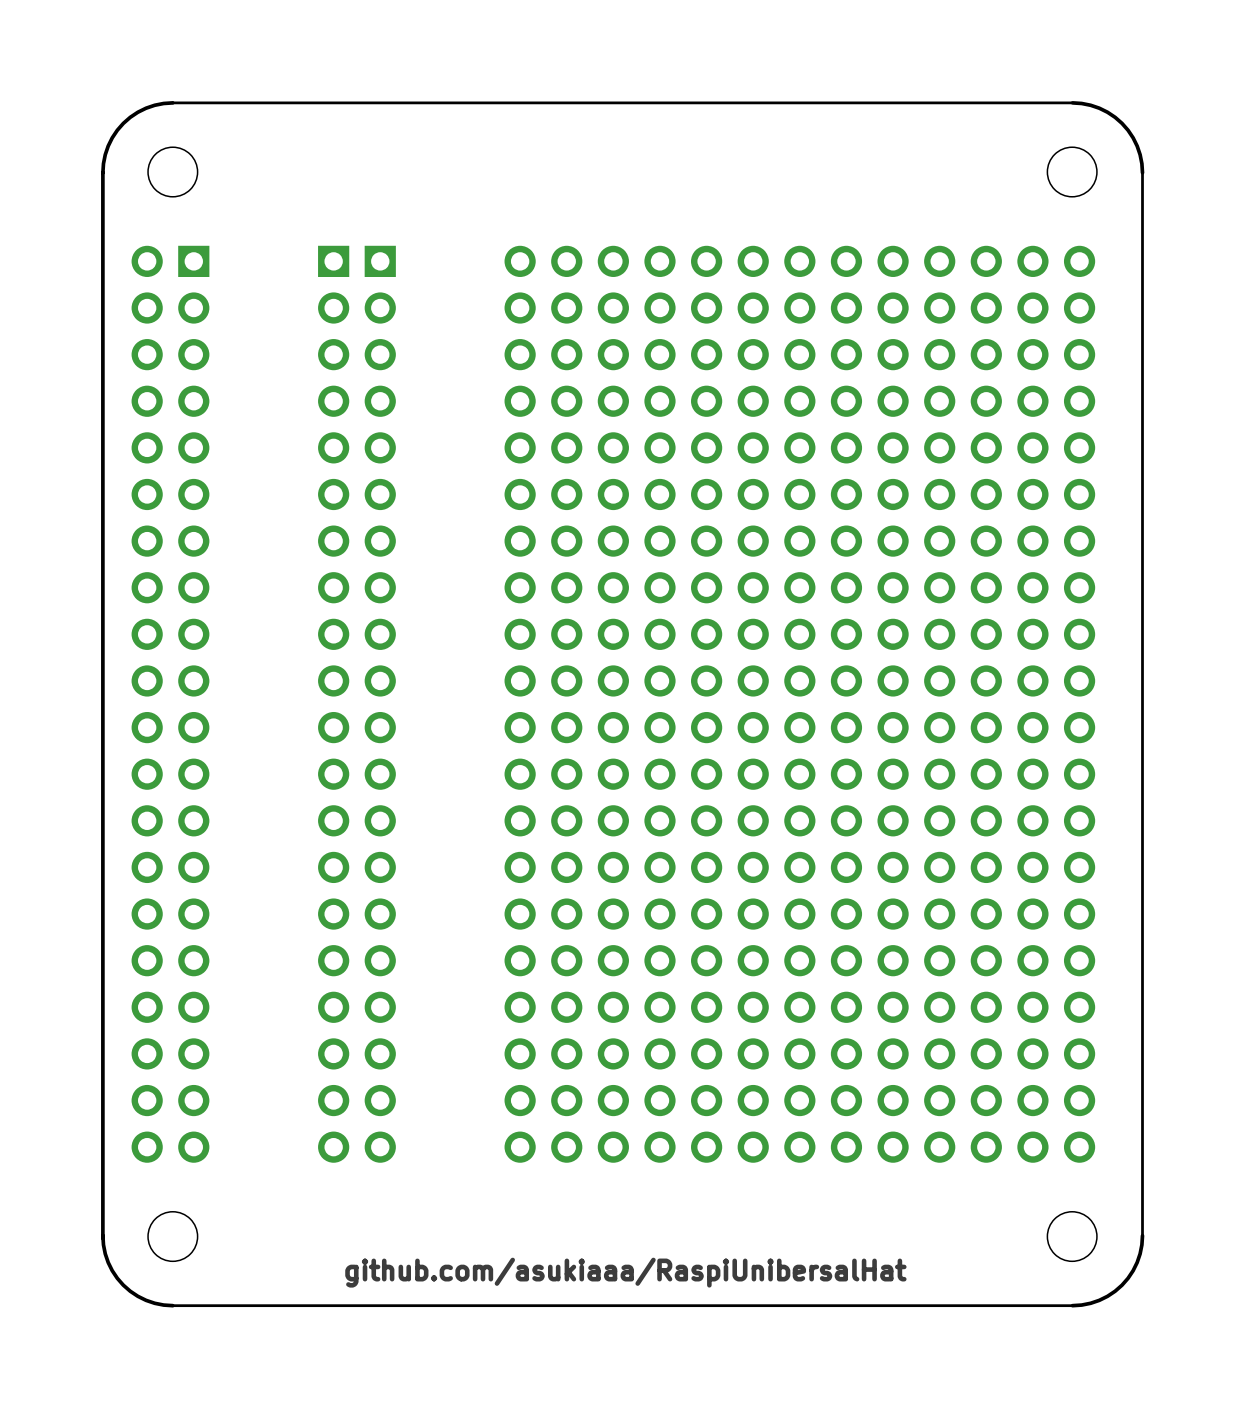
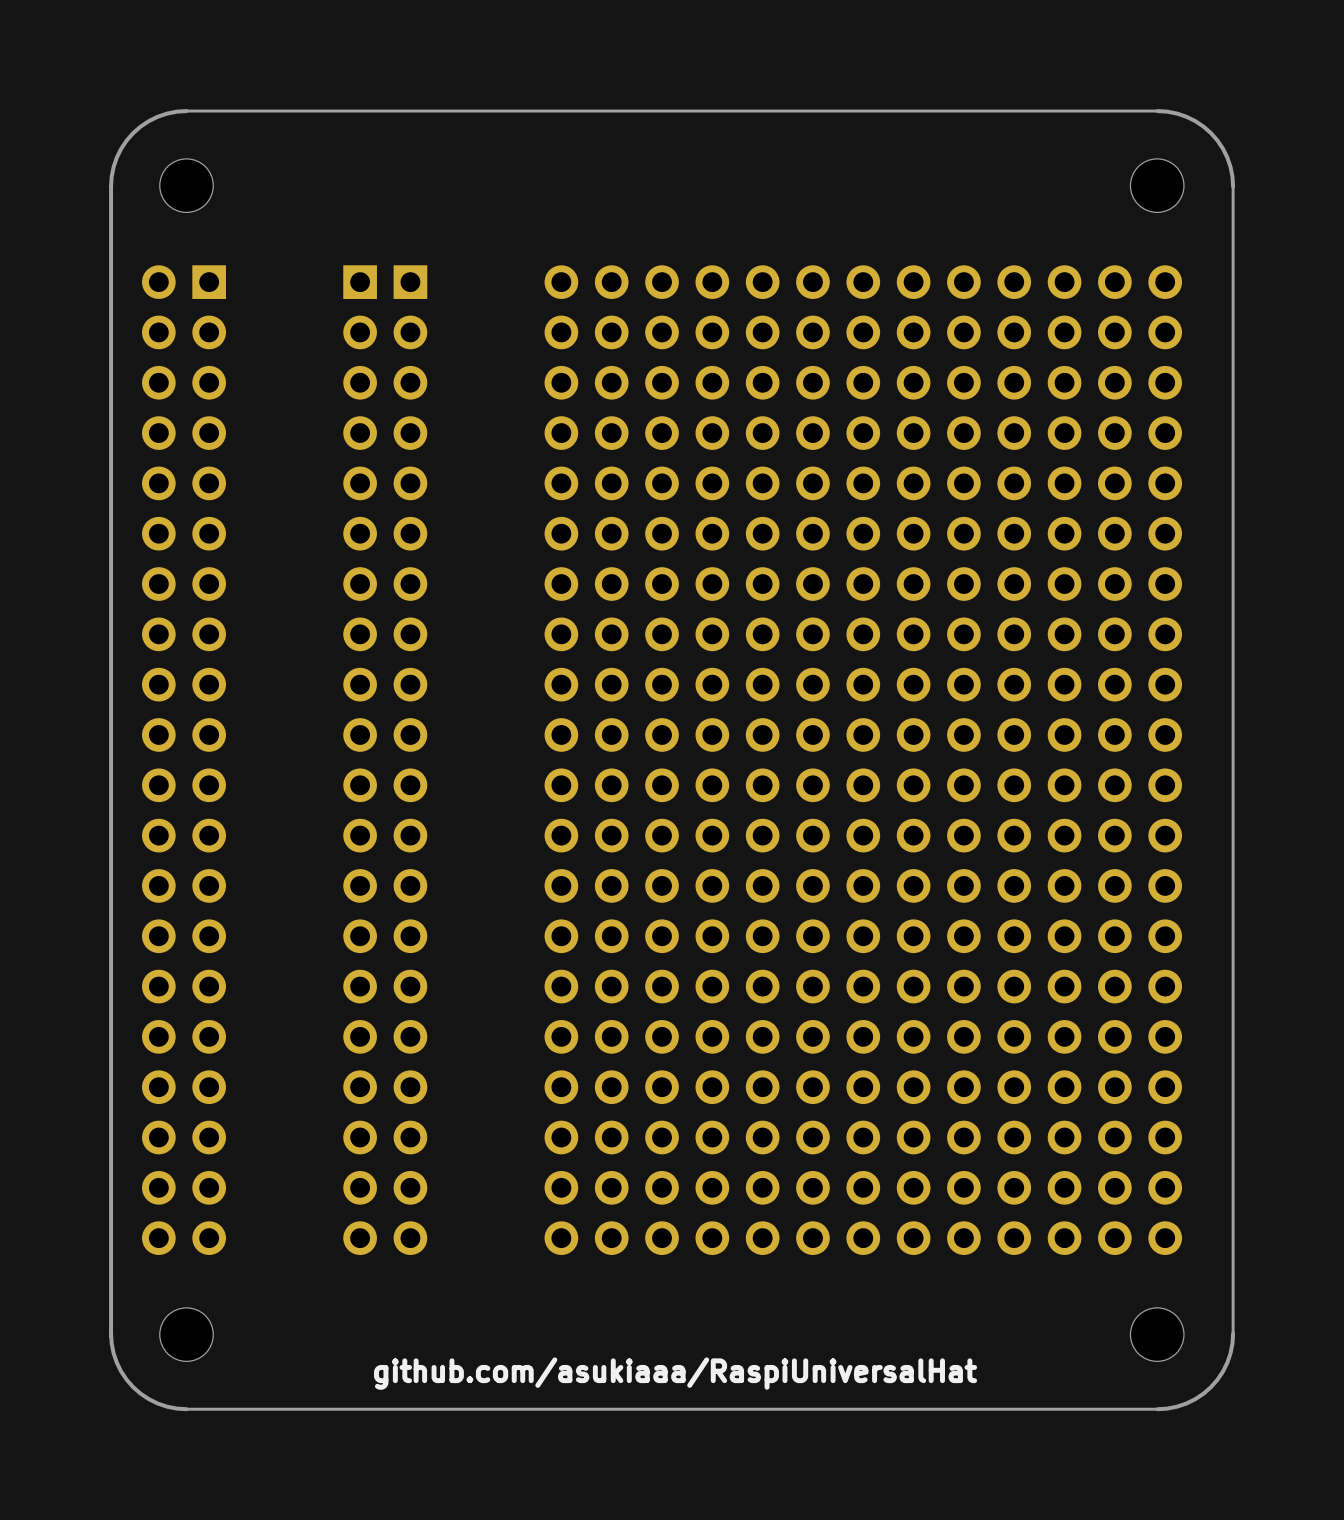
text: github.com/asukiaaa/RaspiUnibersalHat (625, 1272) -> github.com/asukiaaa/RaspiUniversalHat (675, 1373)

